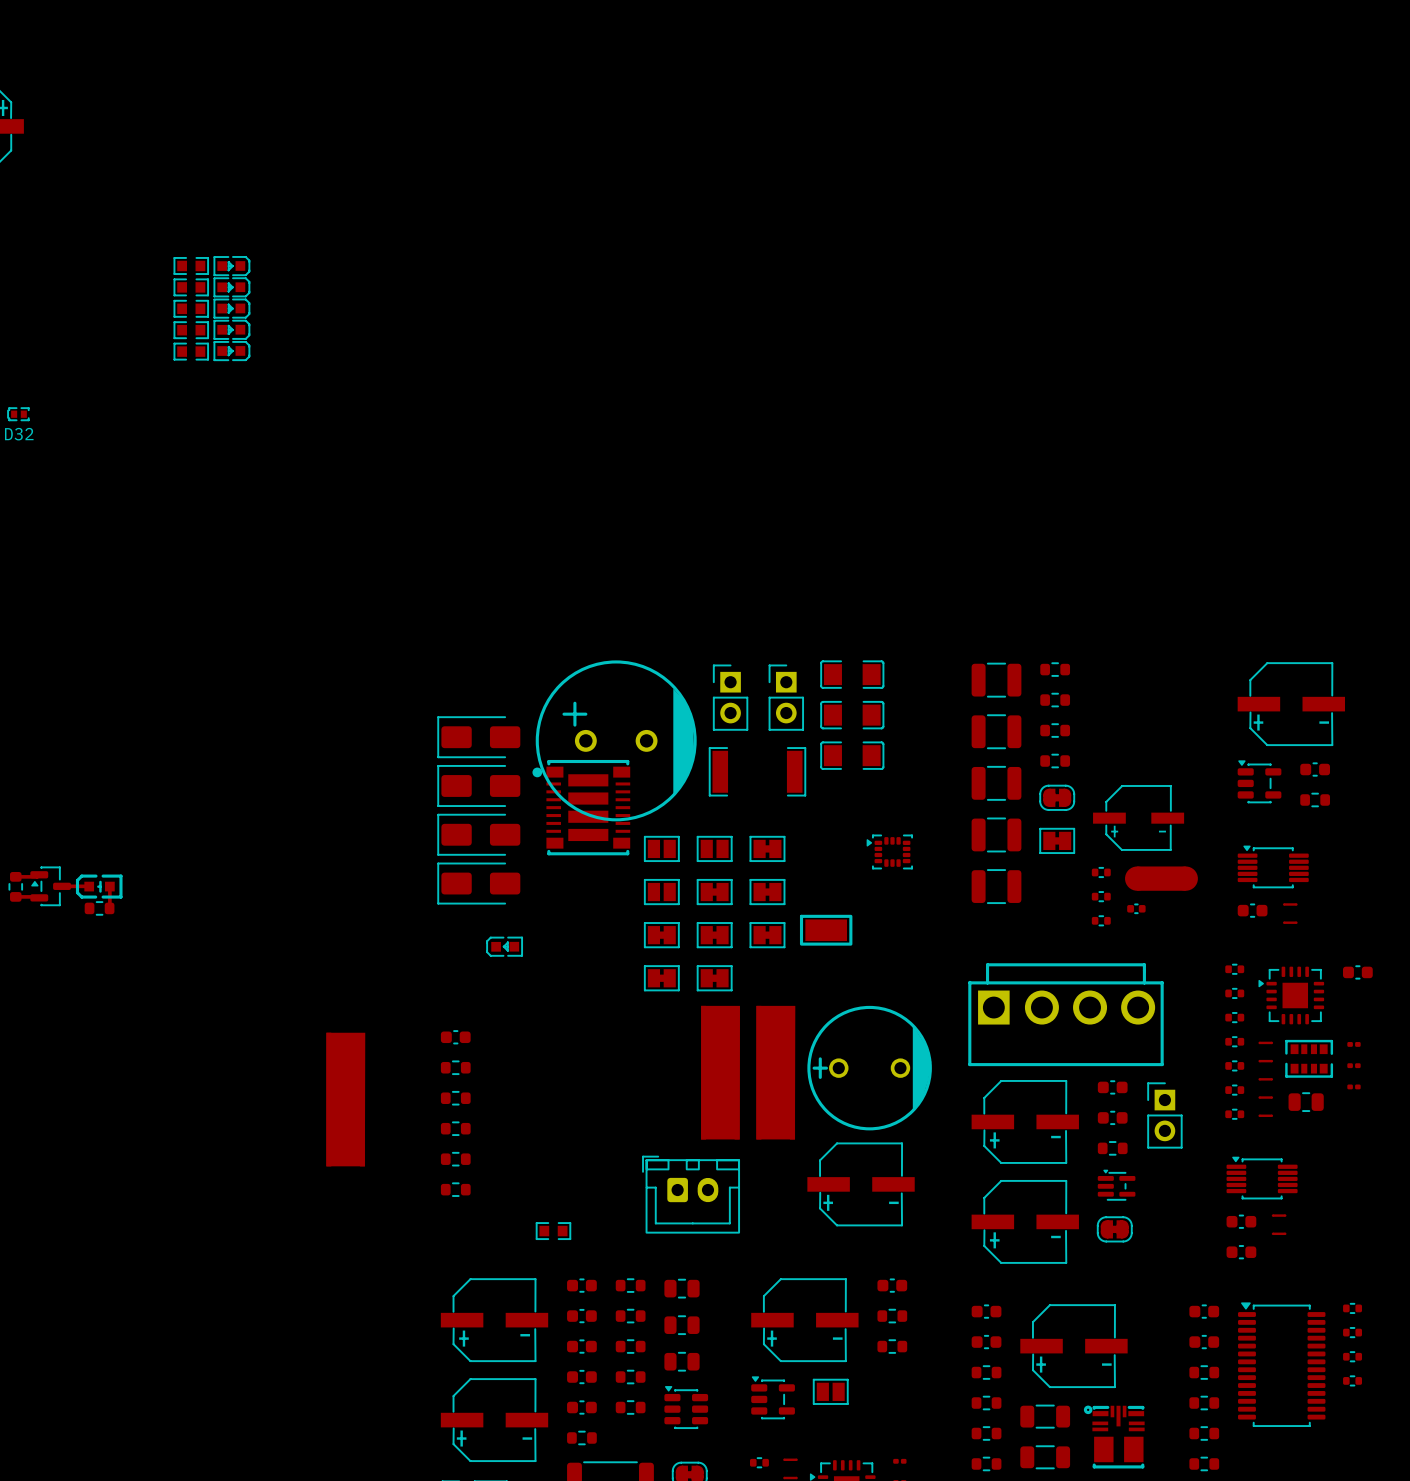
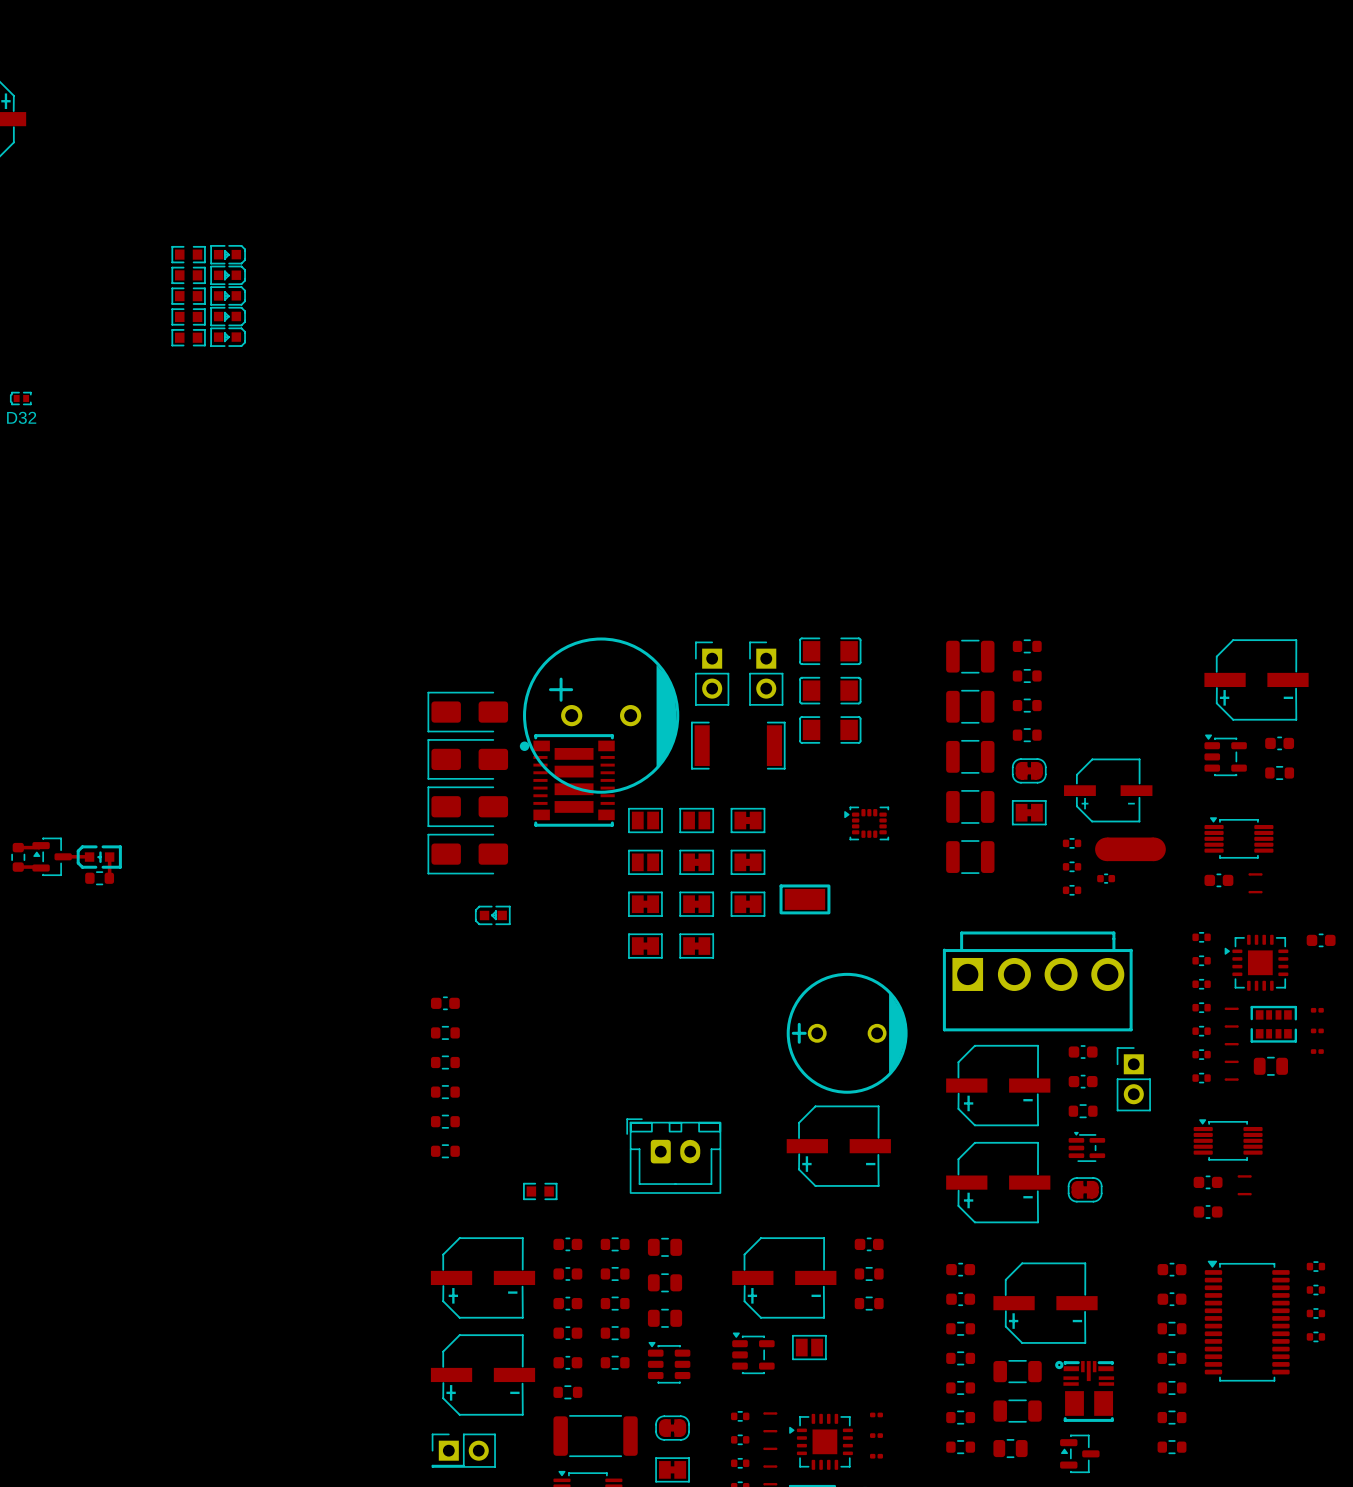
part: (720, 1072) -> none
part: (775, 1072) -> none
part: (345, 1099) -> none

